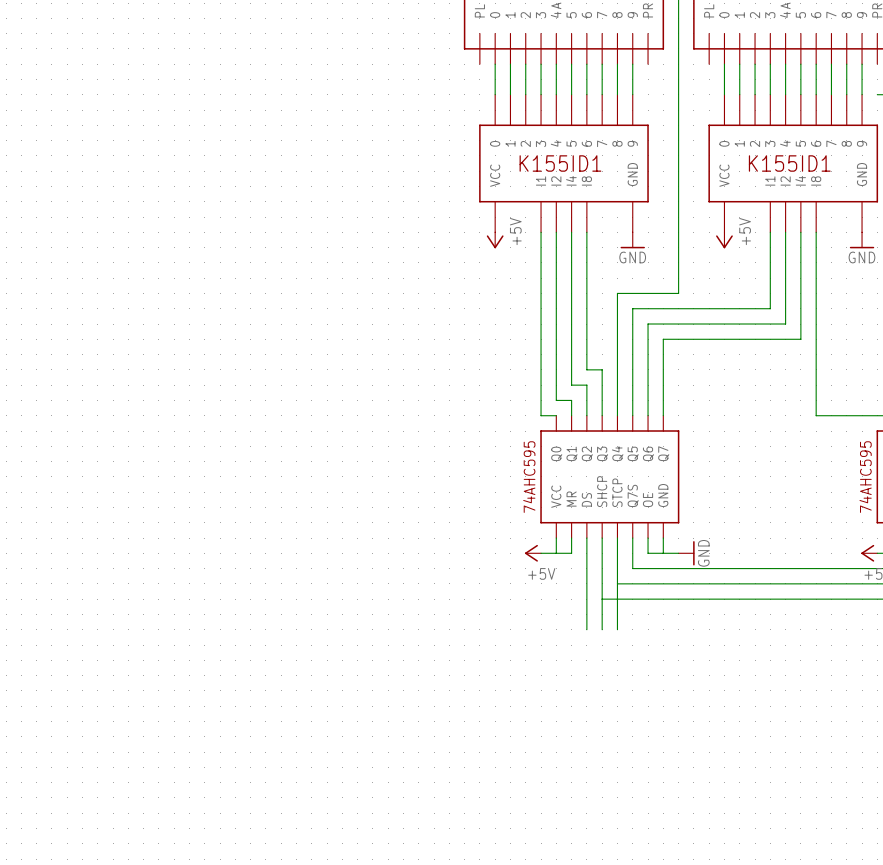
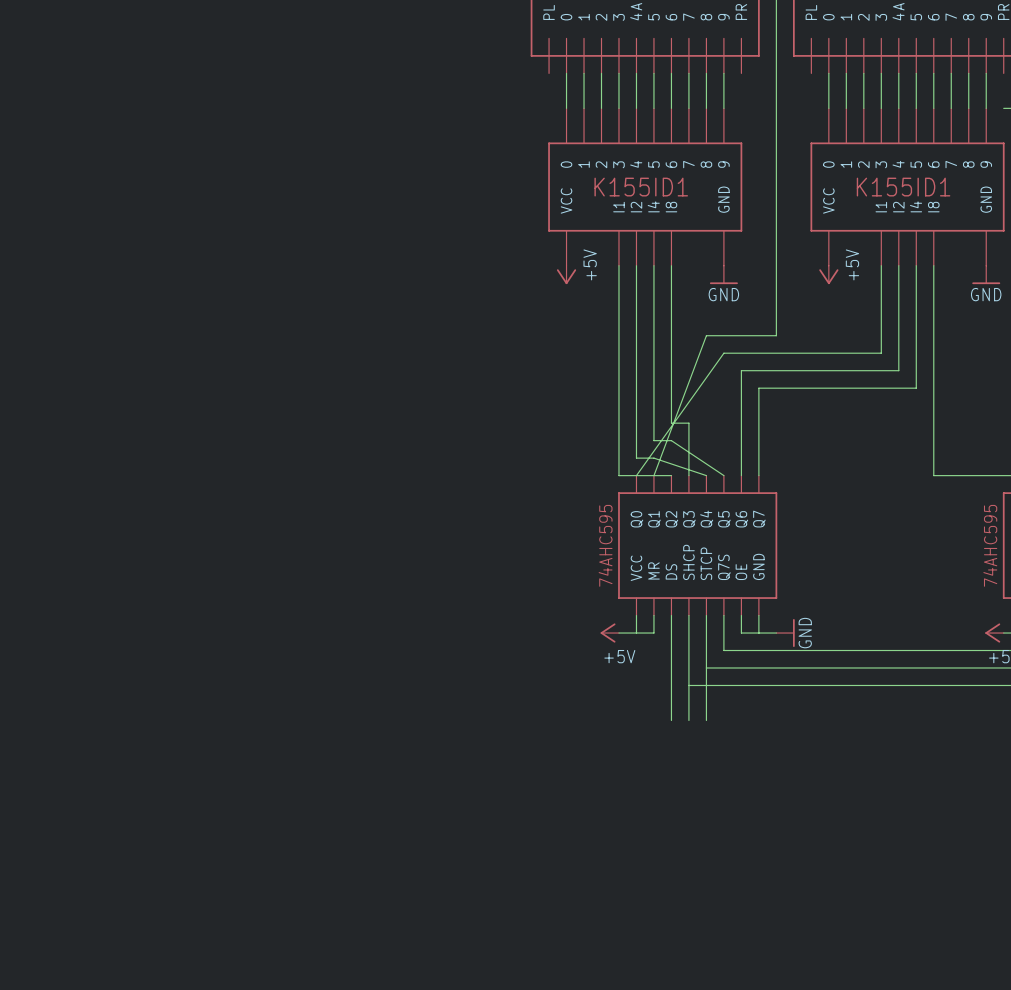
wire: (617, 293) (617, 415) -> (706, 335) (653, 475)
wire: (632, 308) (632, 415) -> (723, 353) (636, 475) (671, 475)
wire: (586, 385) (586, 415) -> (671, 440) (723, 475)
wire: (571, 400) (571, 415) -> (653, 458) (706, 475)

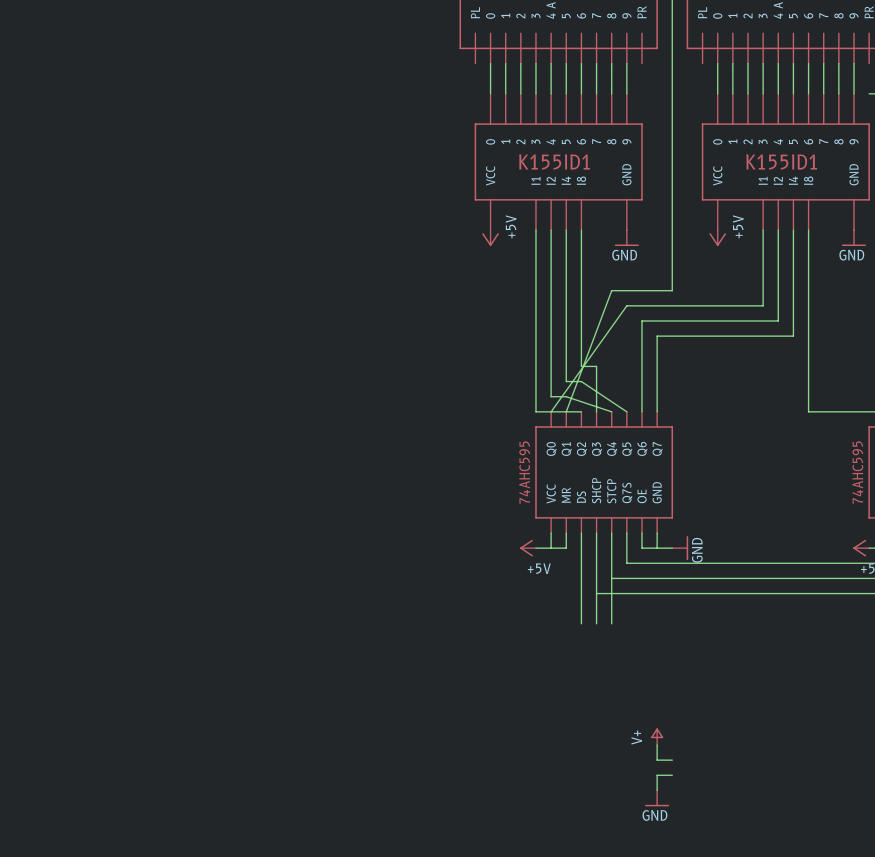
power symbol: none -> V+ (657, 736)
wire: none -> (657, 745) (657, 760) (672, 760)
wire: none -> (672, 775) (657, 775) (657, 790)
power symbol: none -> GND (657, 798)

